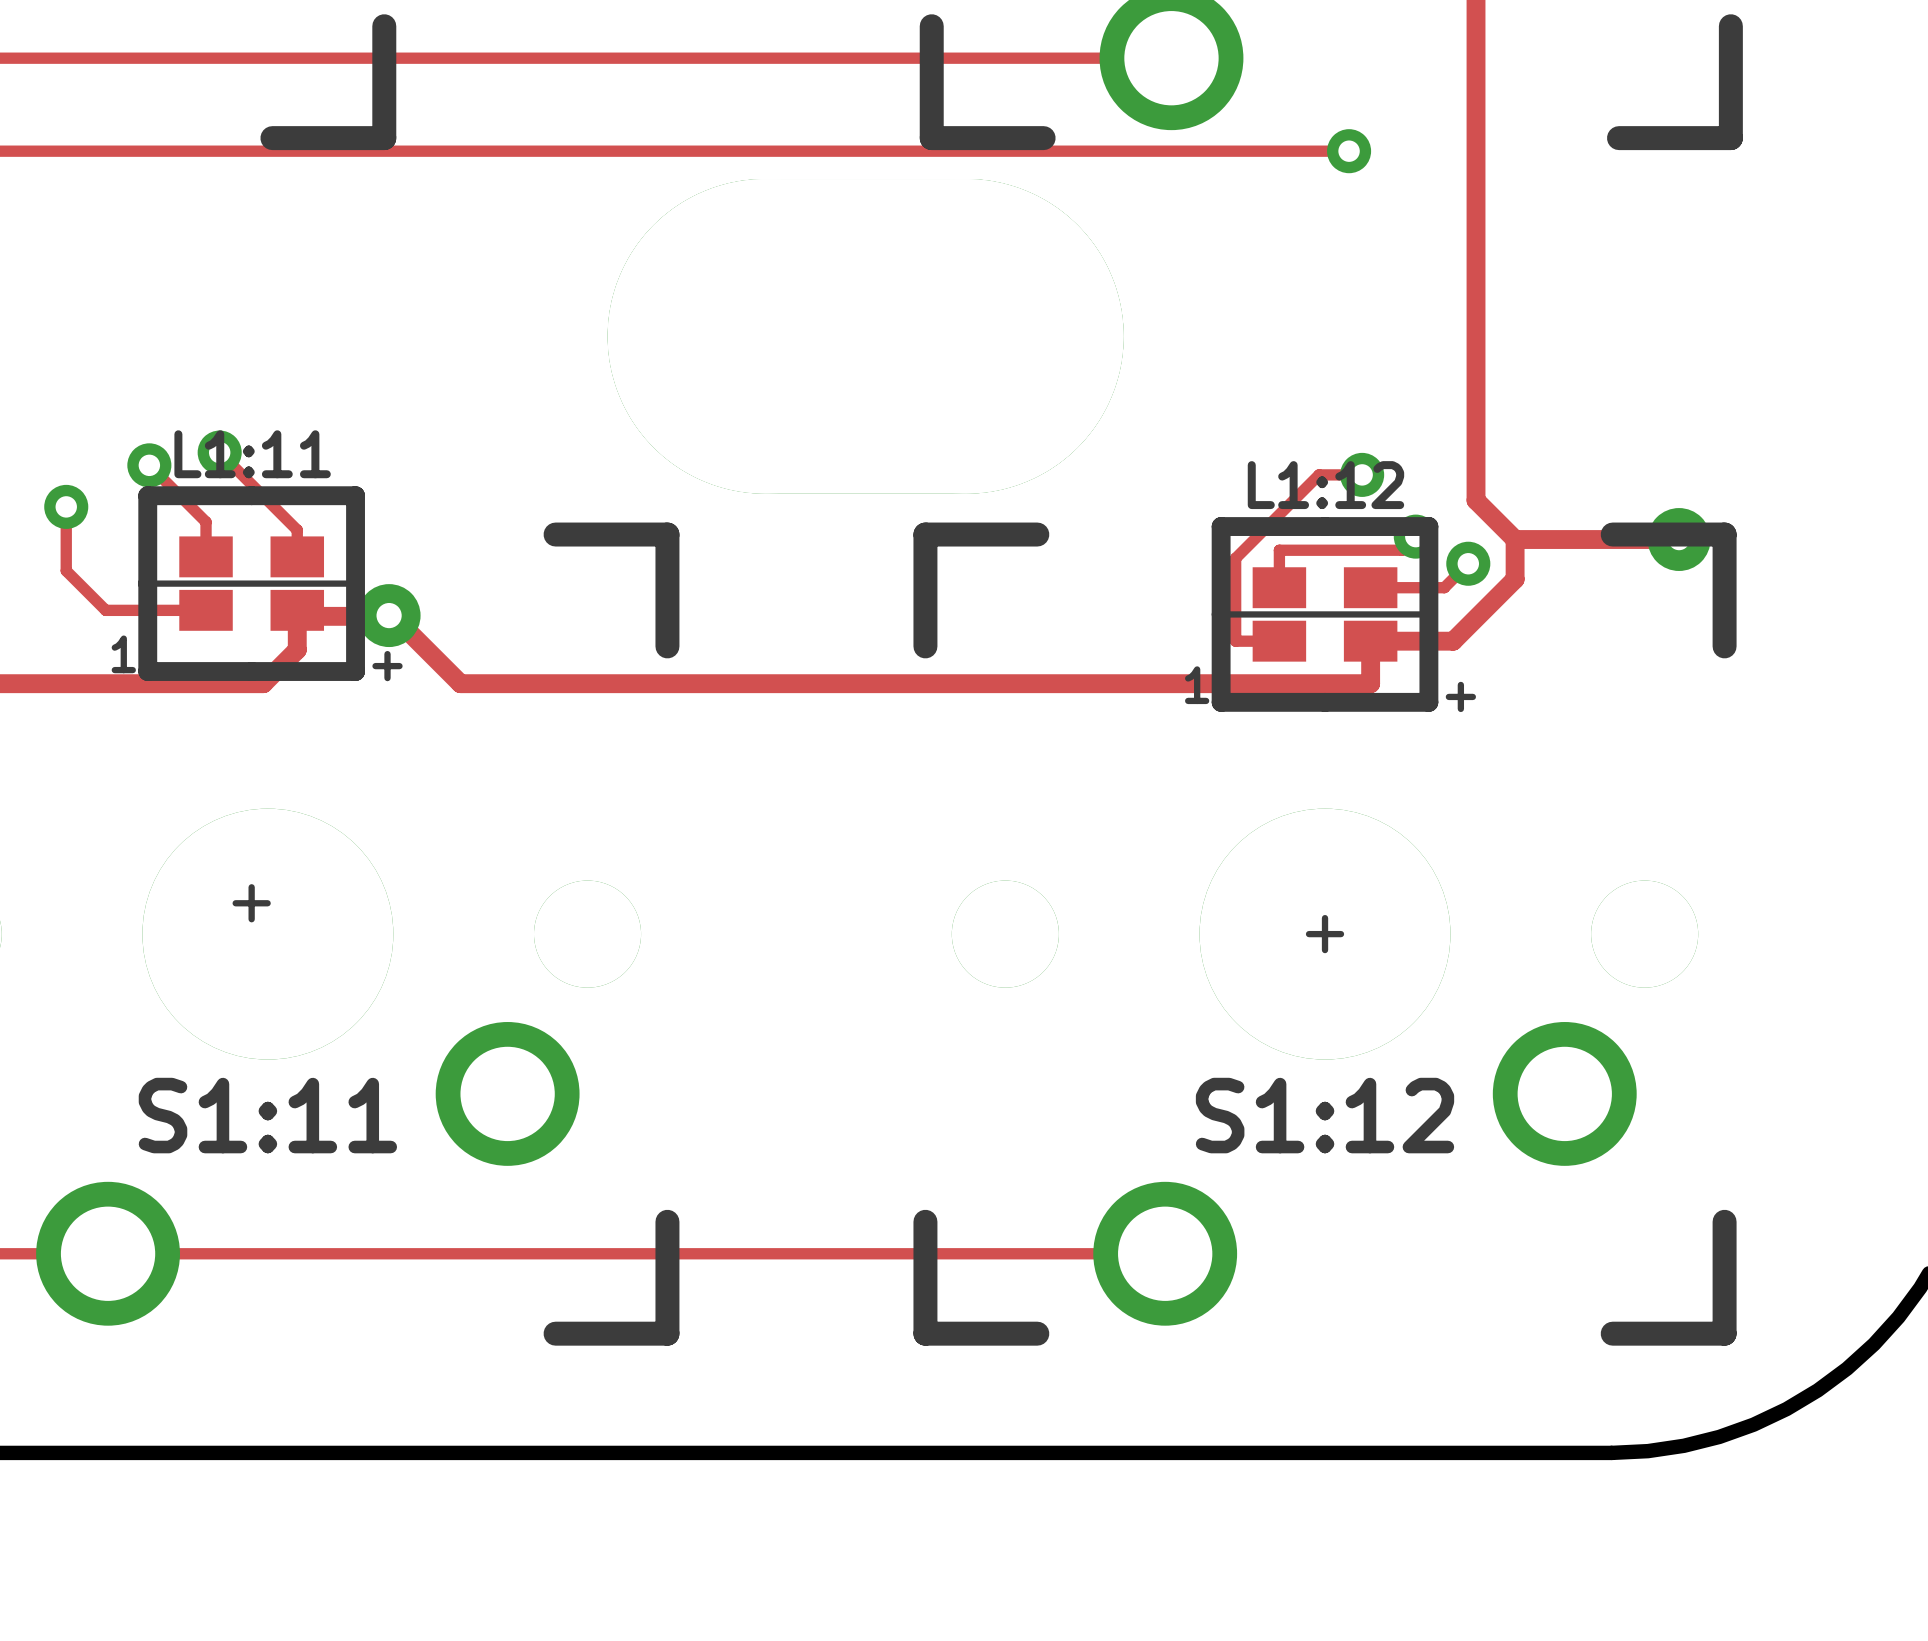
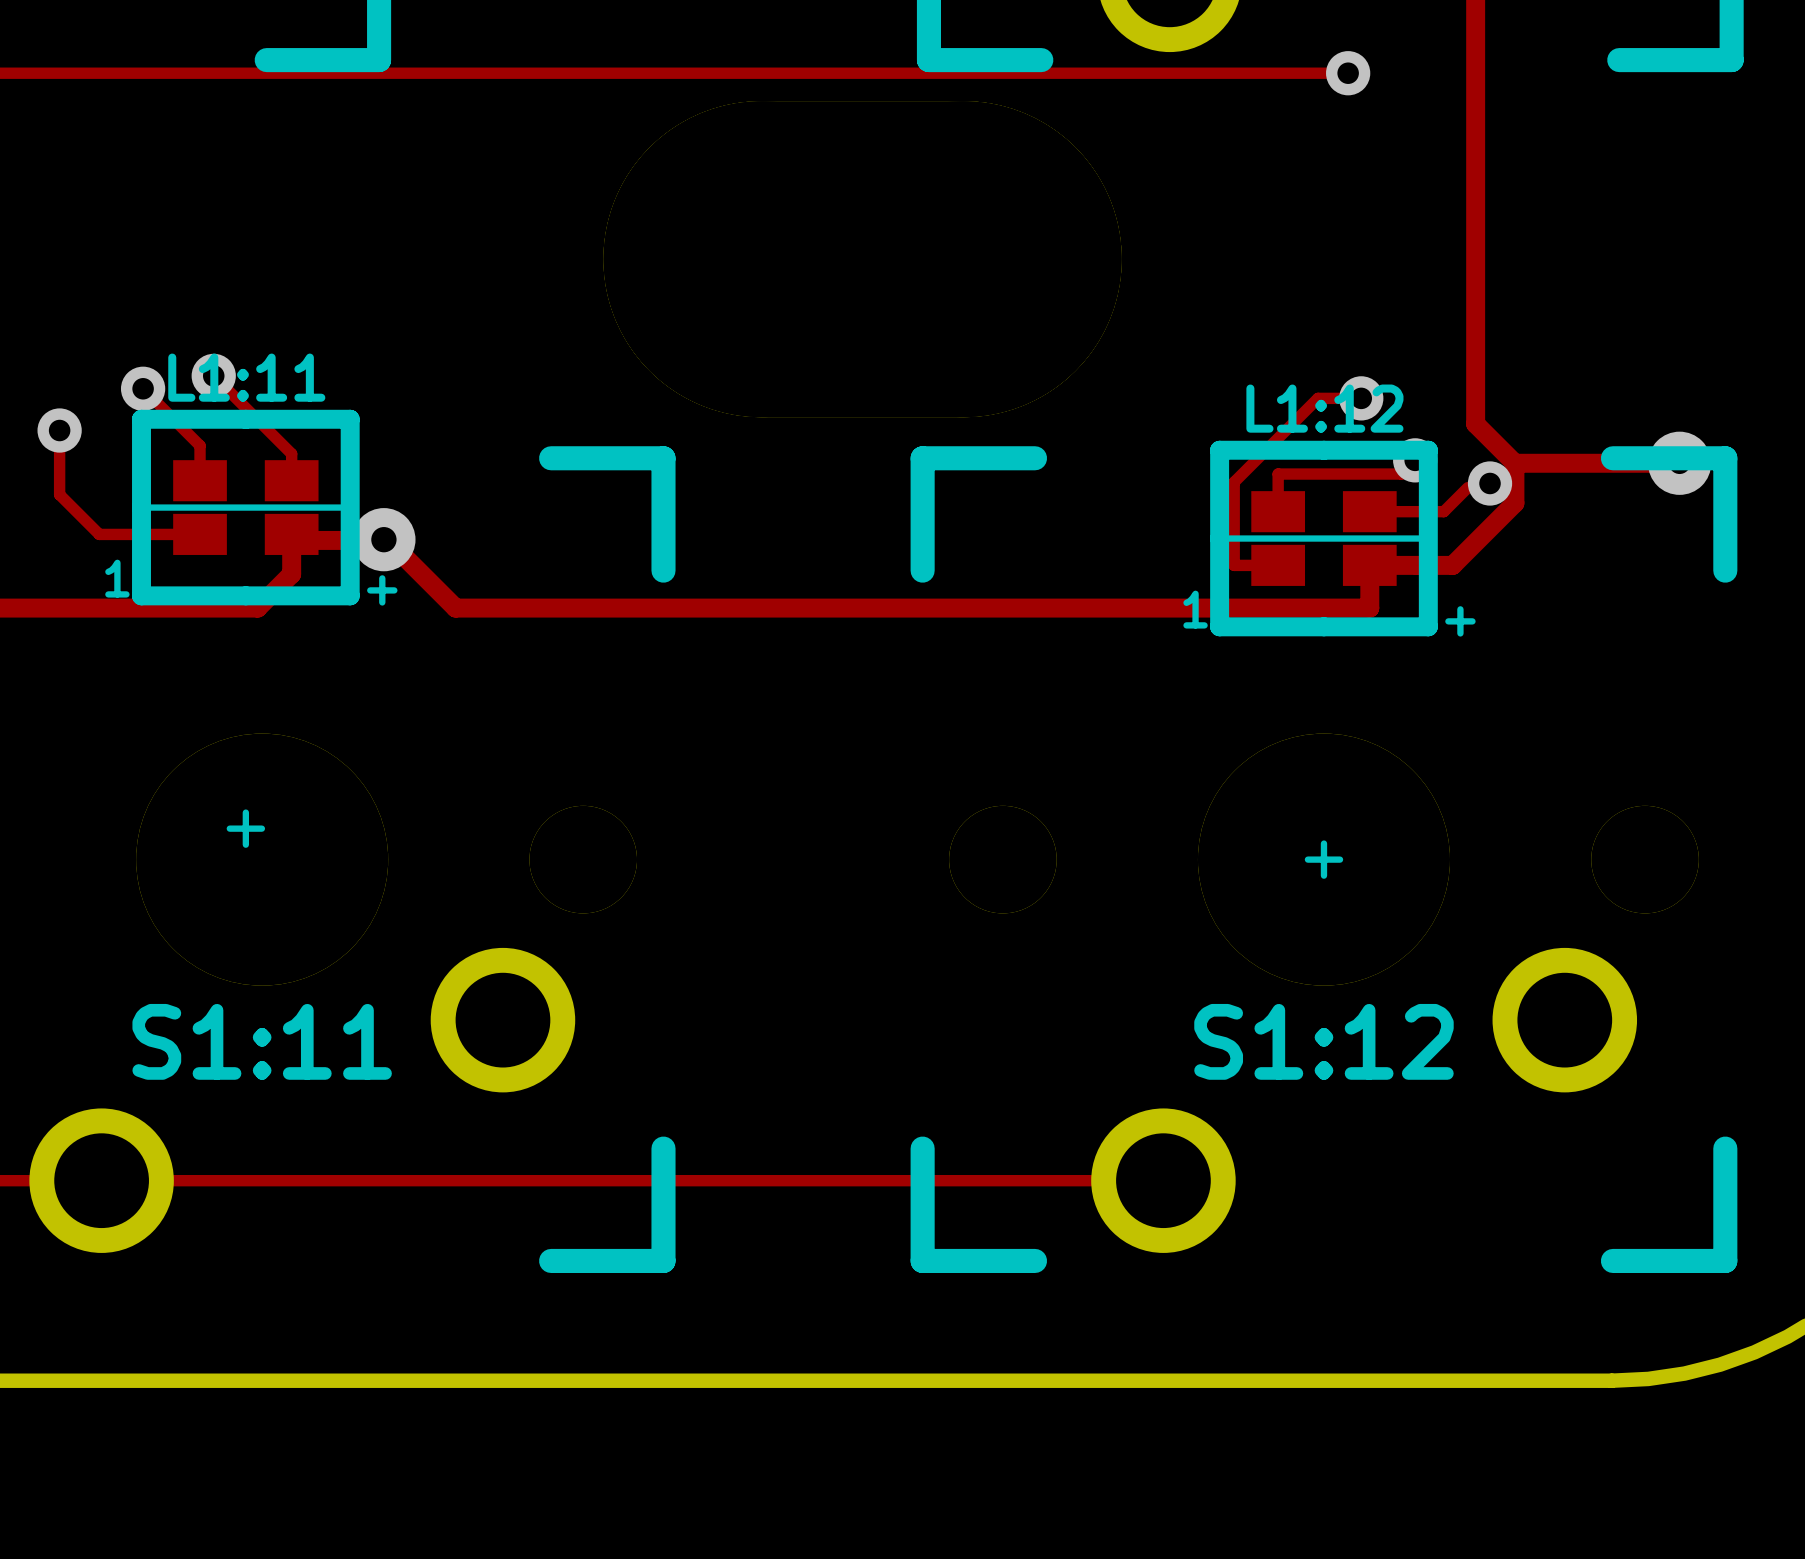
via position: (1468, 563) -> (1490, 483)

